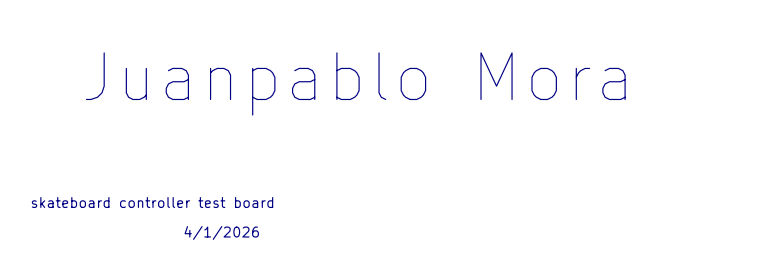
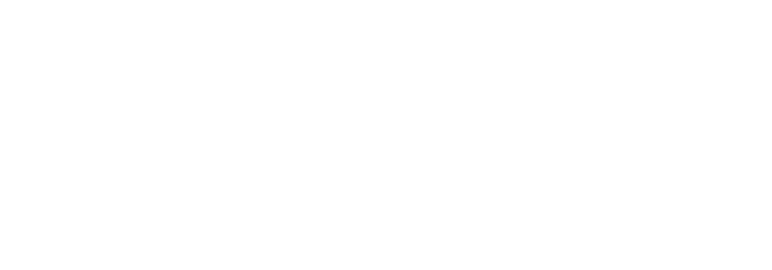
text: Juanpablo Mora (355, 83) -> none
text: skateboard controller test board (152, 202) -> none
text: 4/1/2026 (221, 232) -> none

